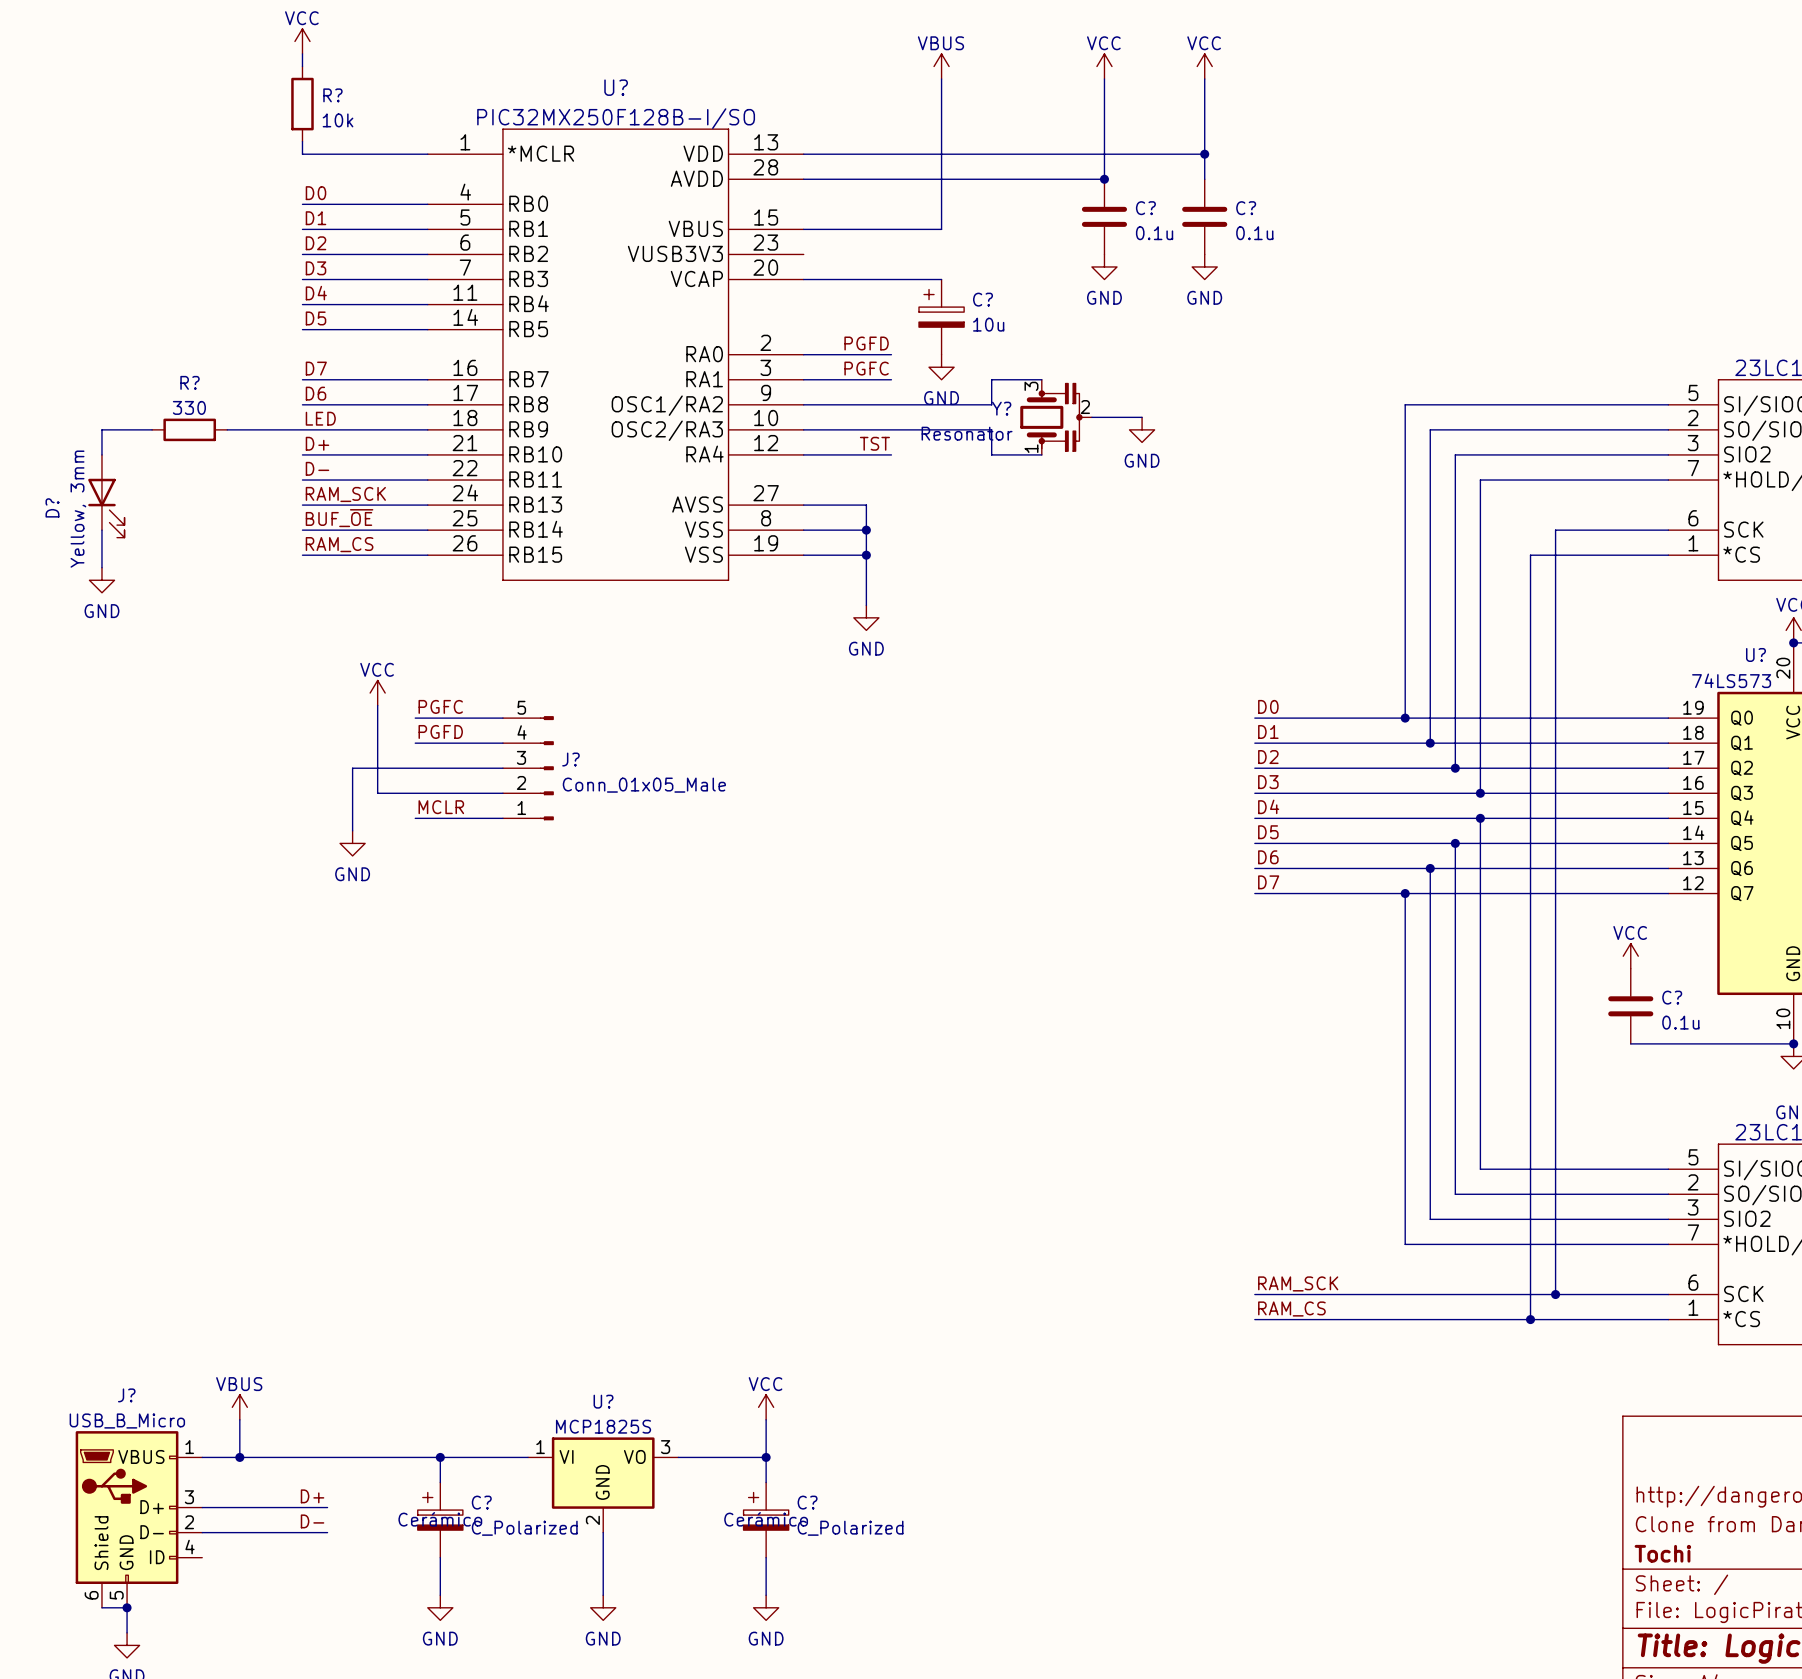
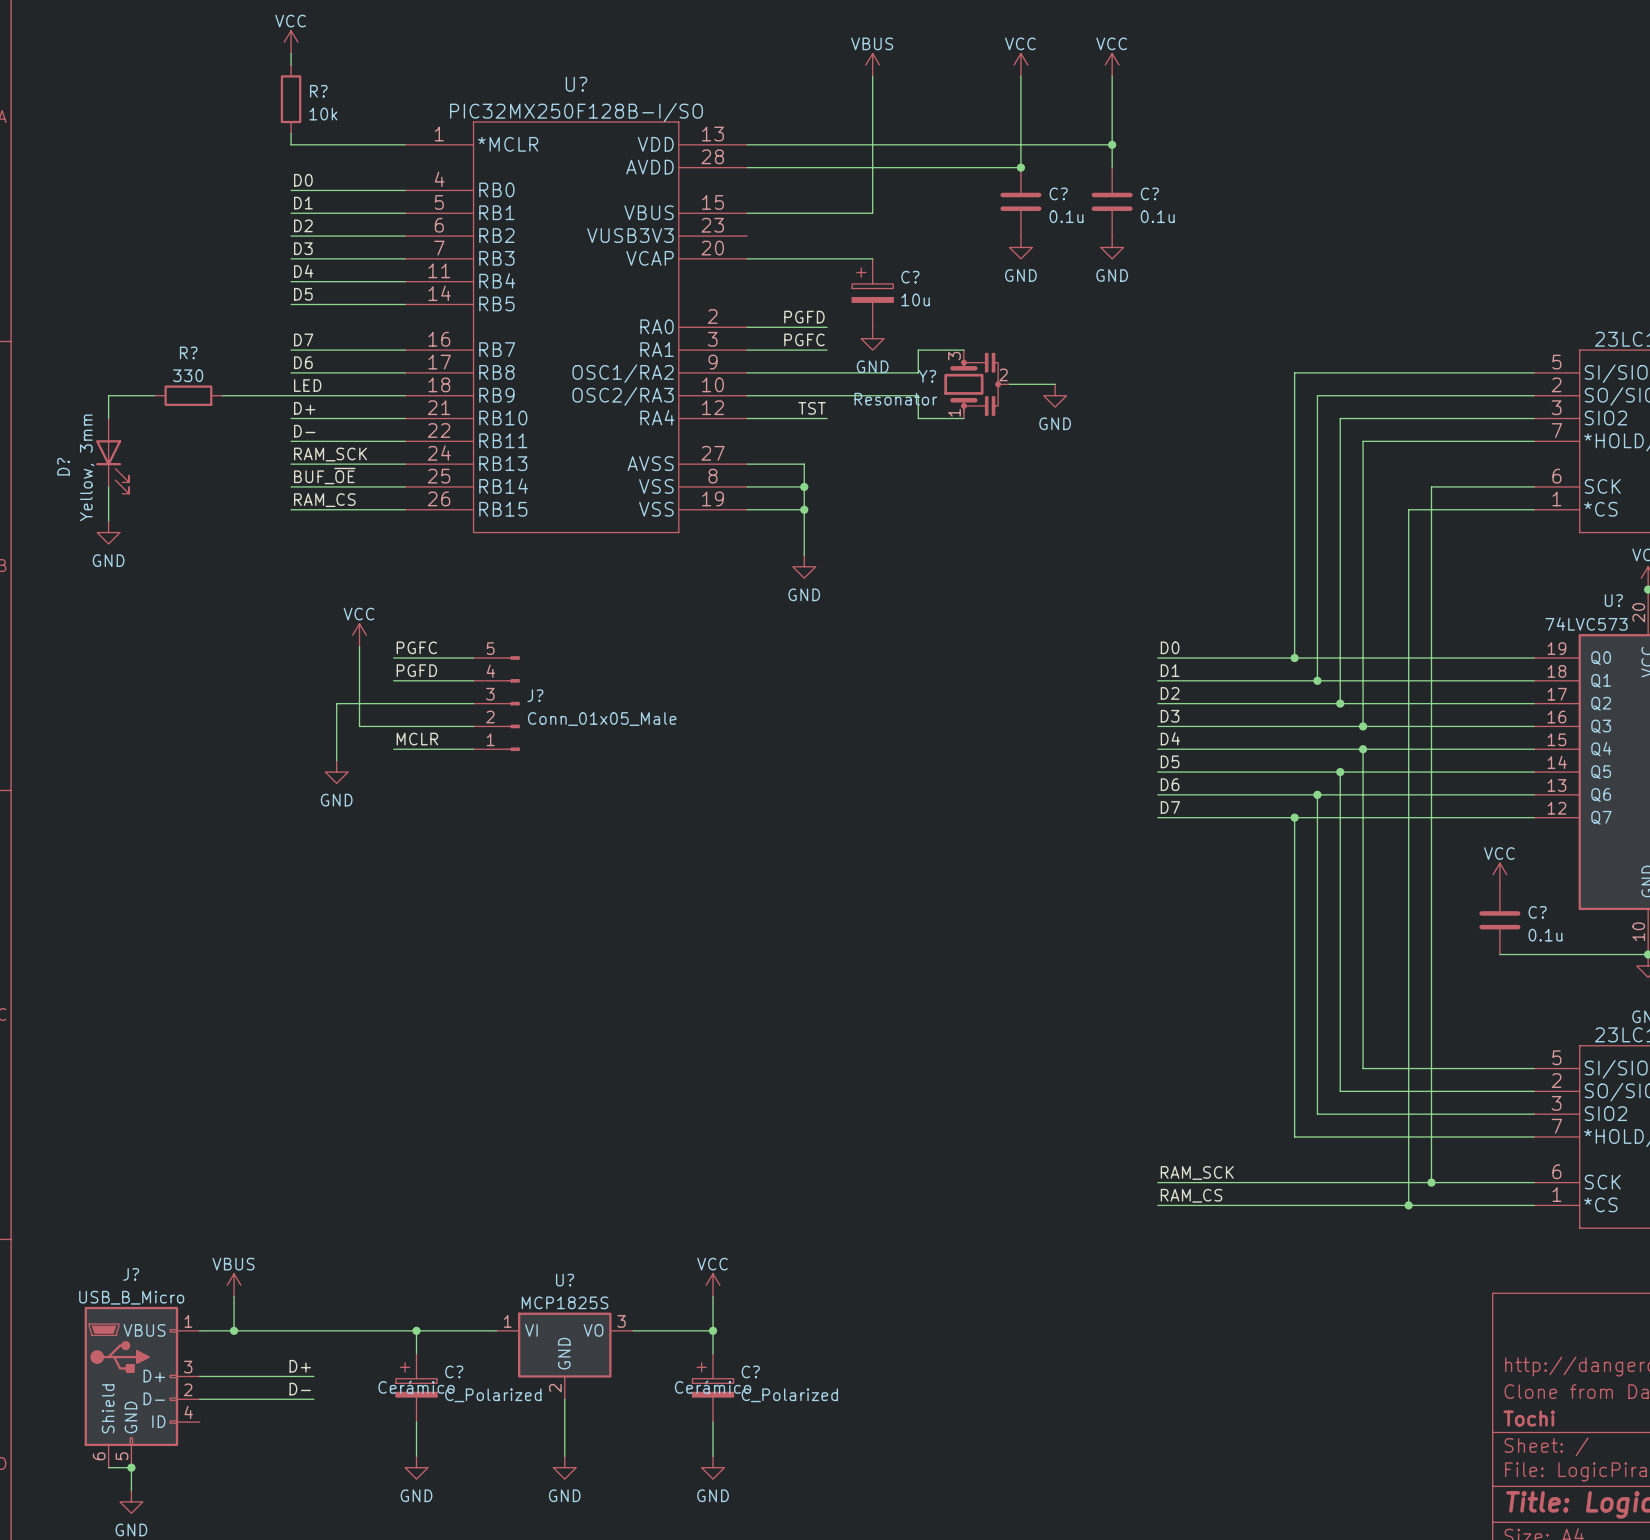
U? value: 74LS573 (1731, 680) -> 74LVC573 (1586, 624)

